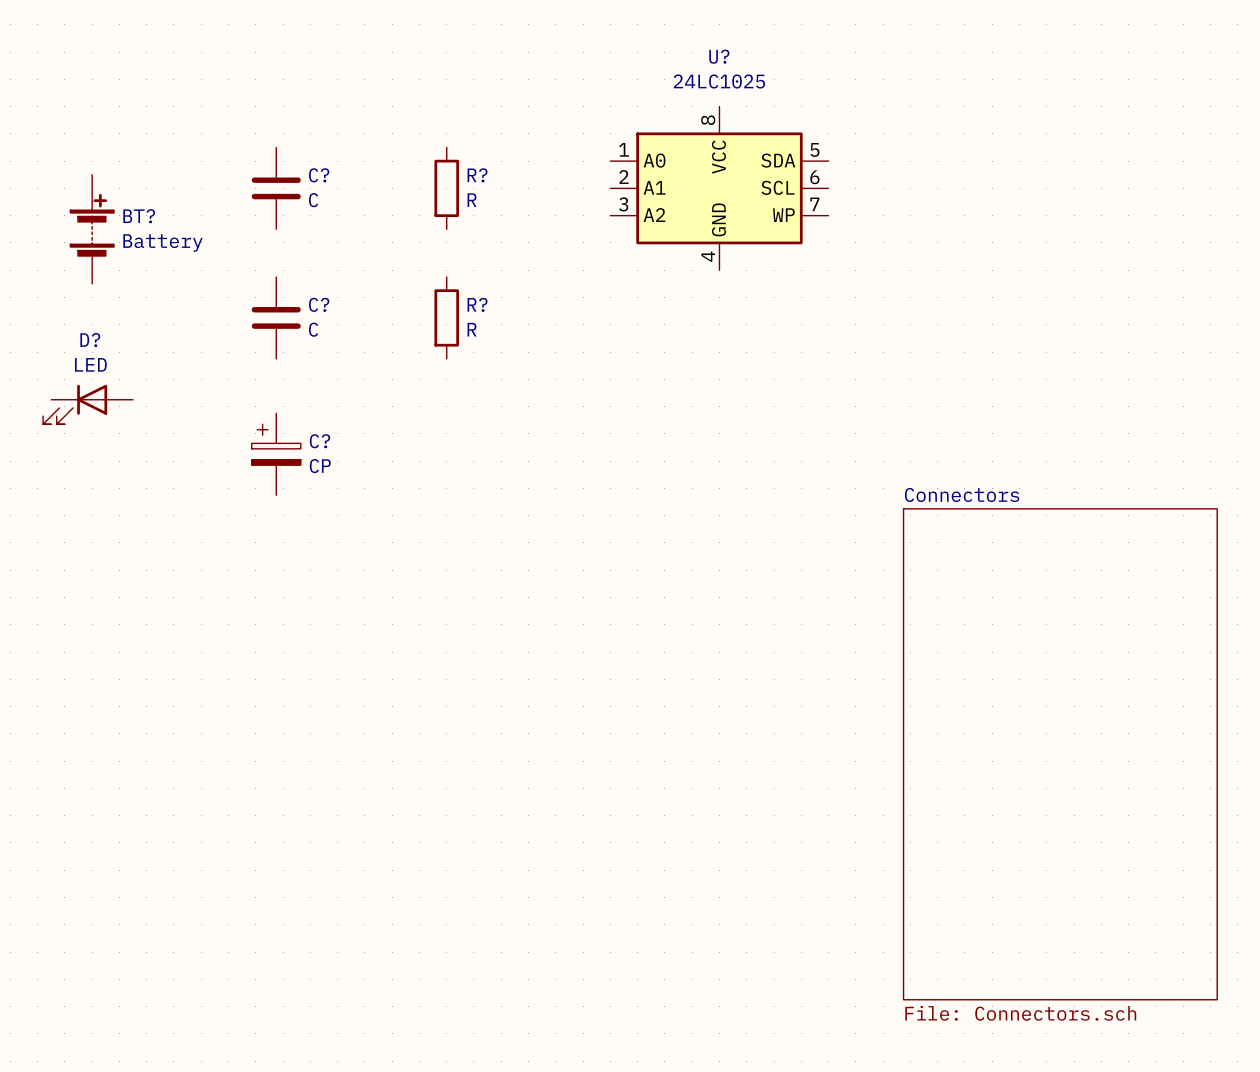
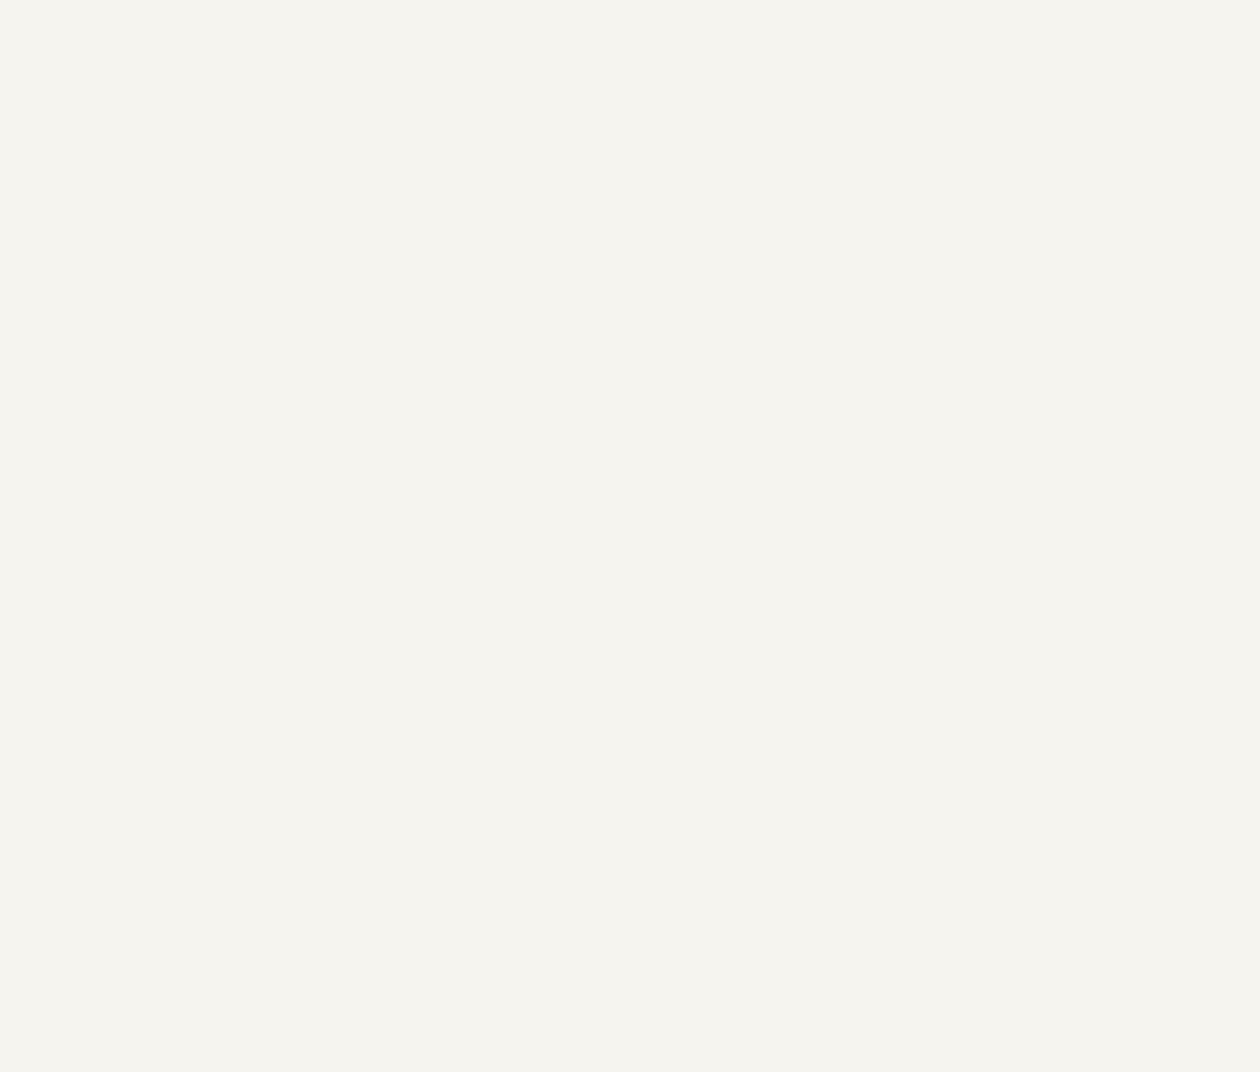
C?: C (276, 188) -> none
R?: R (446, 188) -> none
U?: 24LC1025 (719, 188) -> none
BT?: Battery (92, 229) -> none
C?: C (276, 317) -> none
R?: R (446, 317) -> none
D?: LED (88, 404) -> none
C?: CP (276, 454) -> none
sheet Connectors: File: Connectors.sch (1060, 754) -> none

